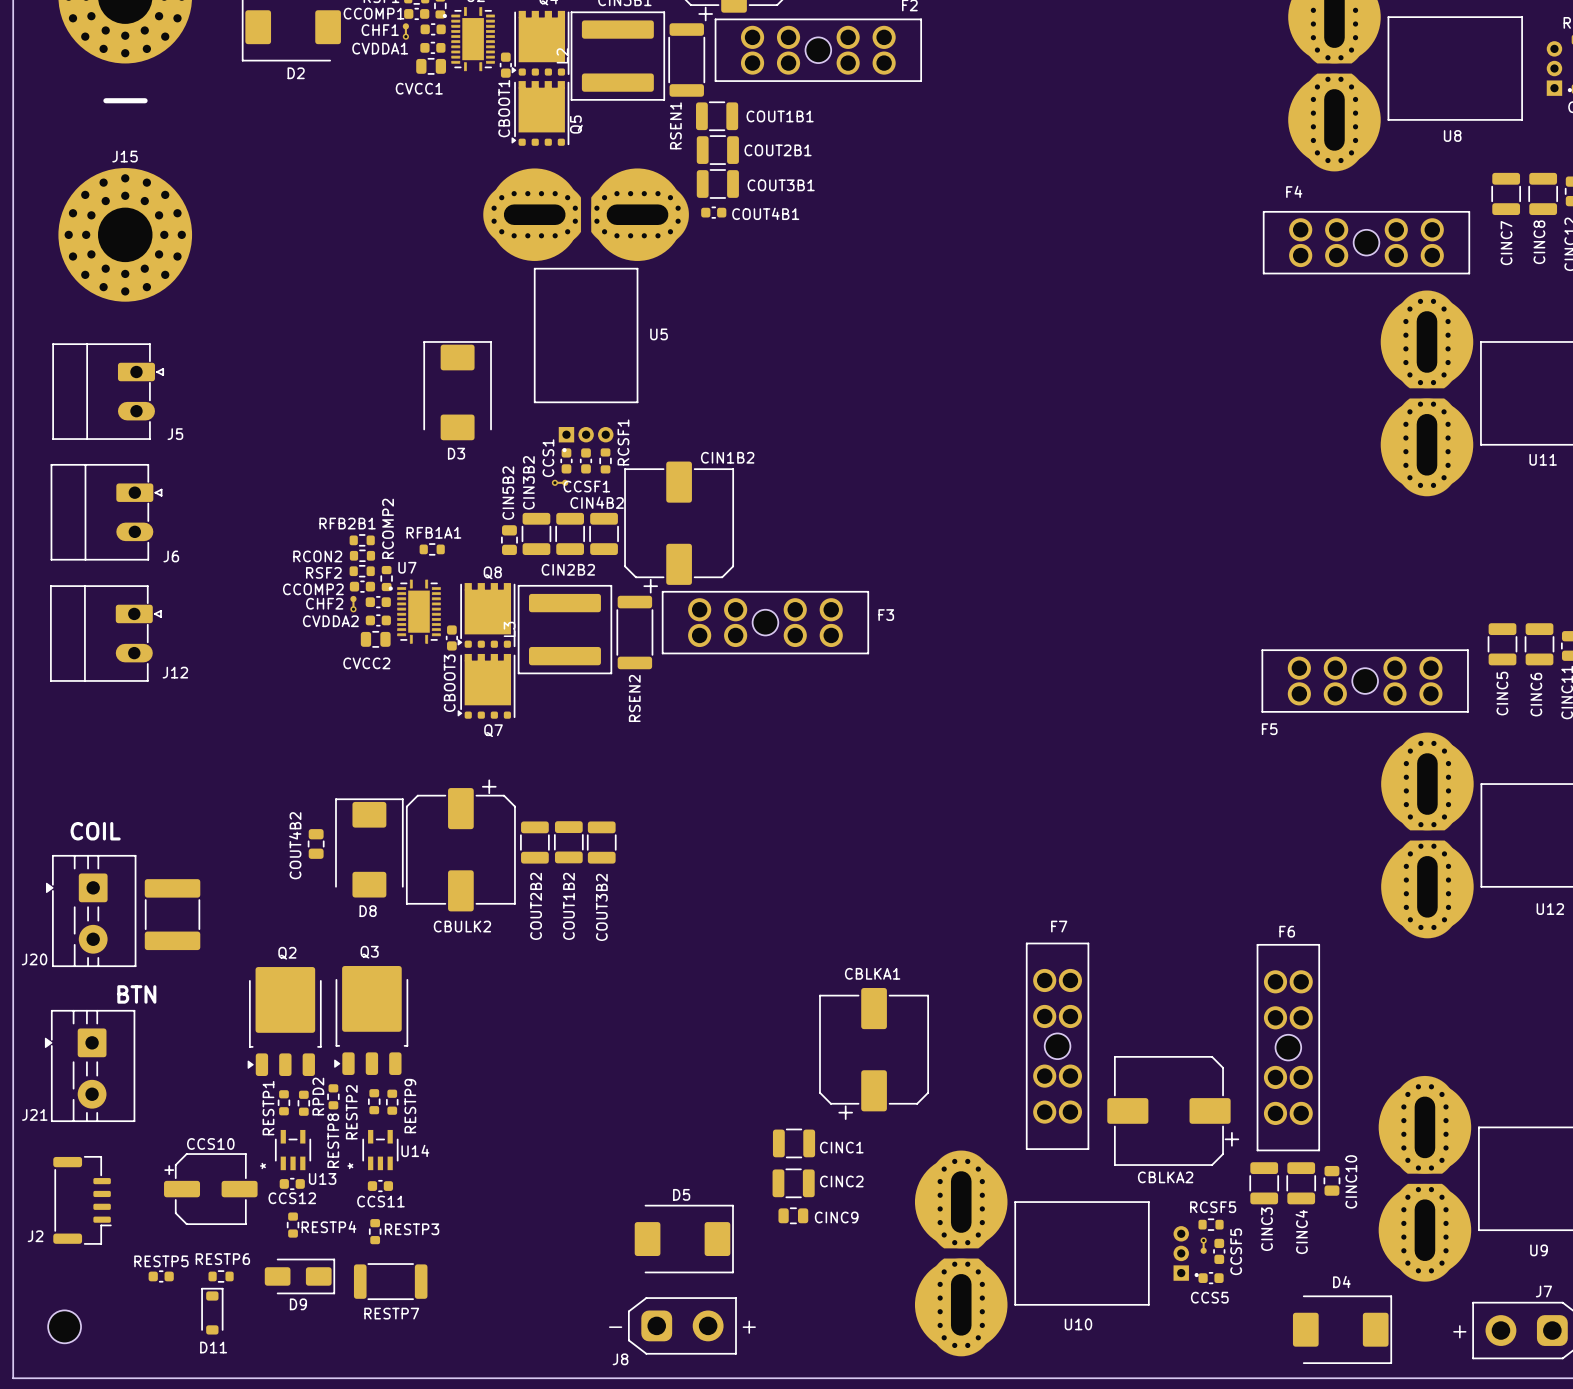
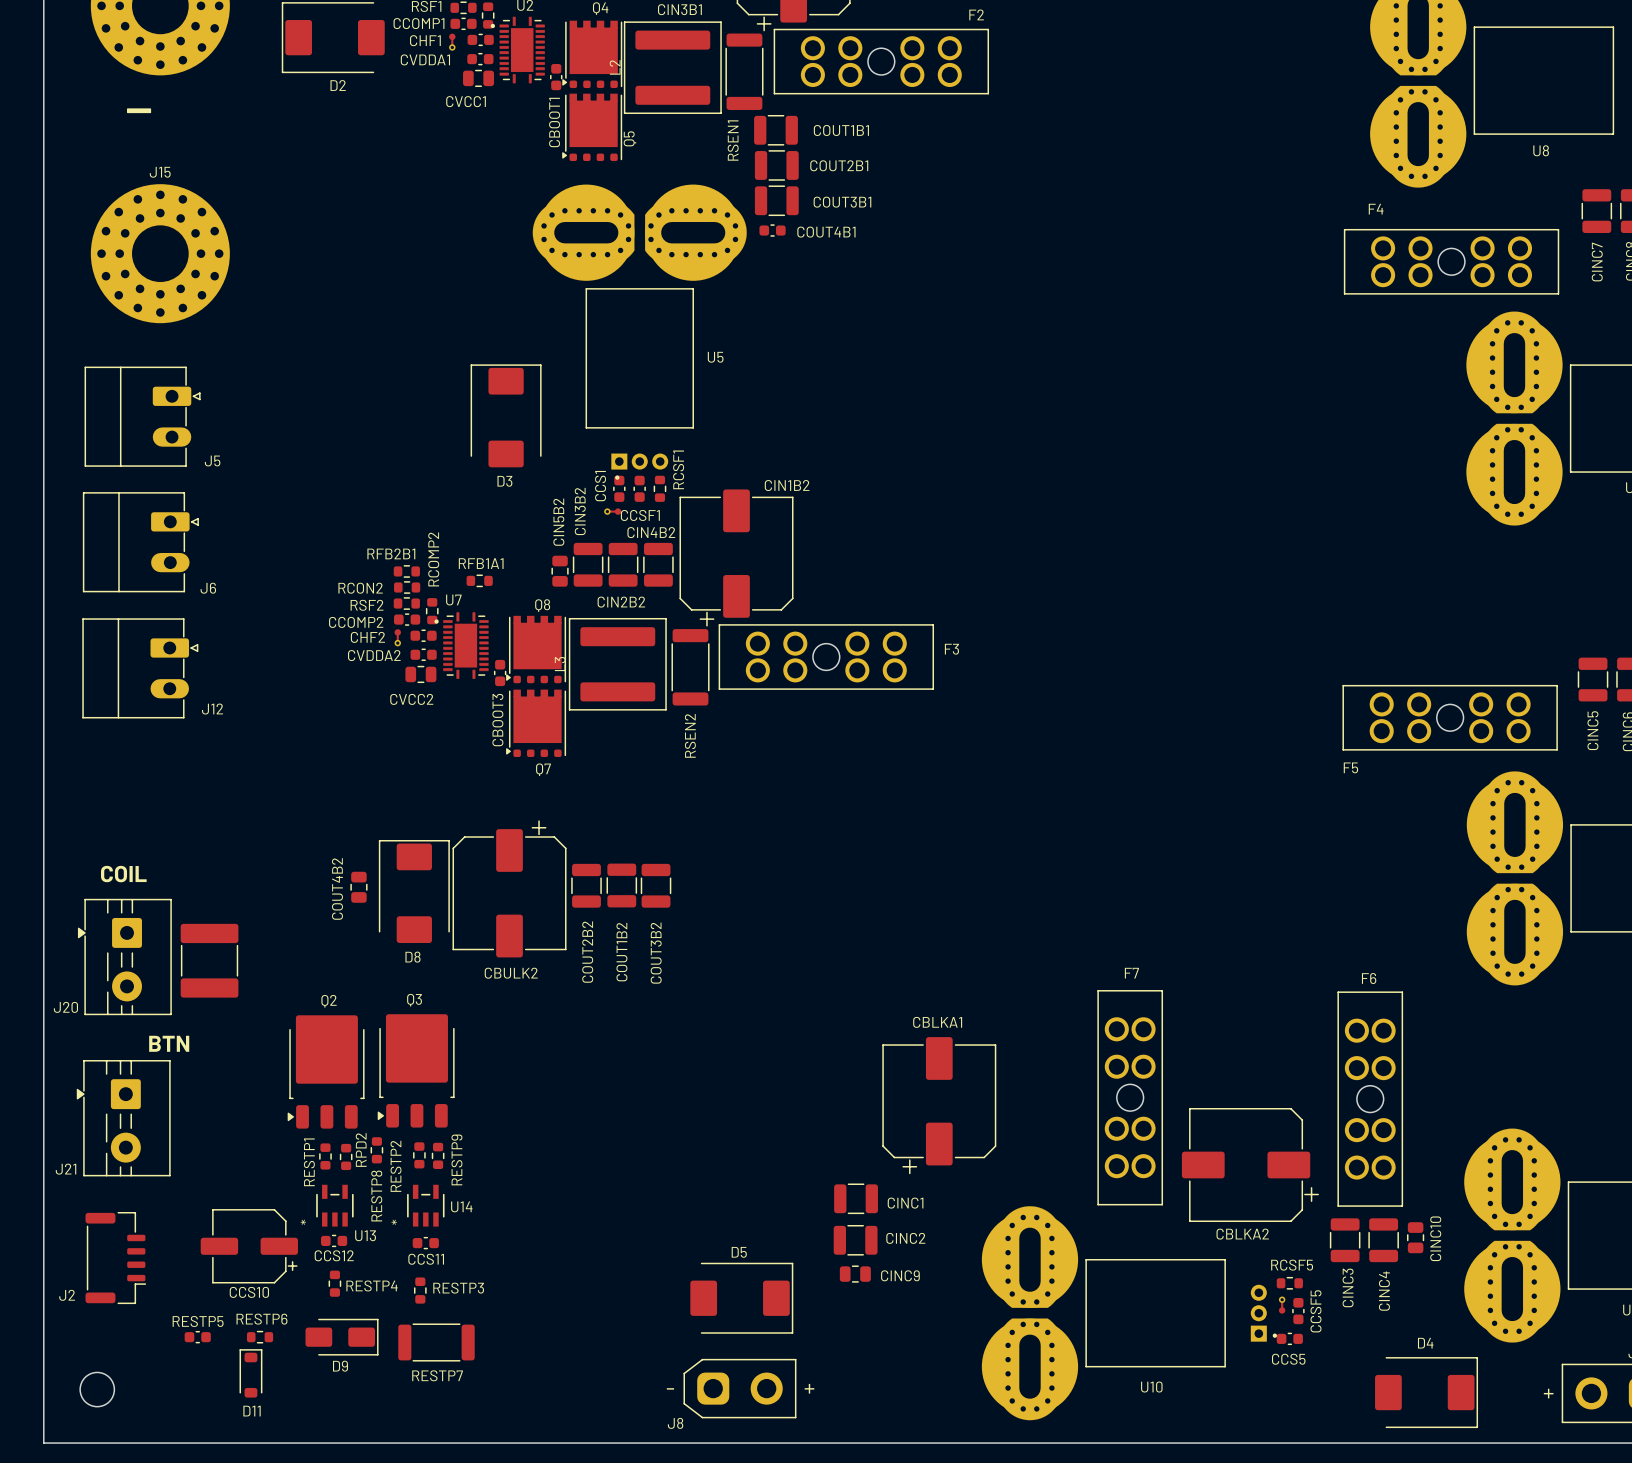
CCS10 name position: CCS10 (210, 1143) -> CCS10 (249, 1292)
CCS10 footprint: [164, 1153, 258, 1225] -> [200, 1209, 299, 1284]

